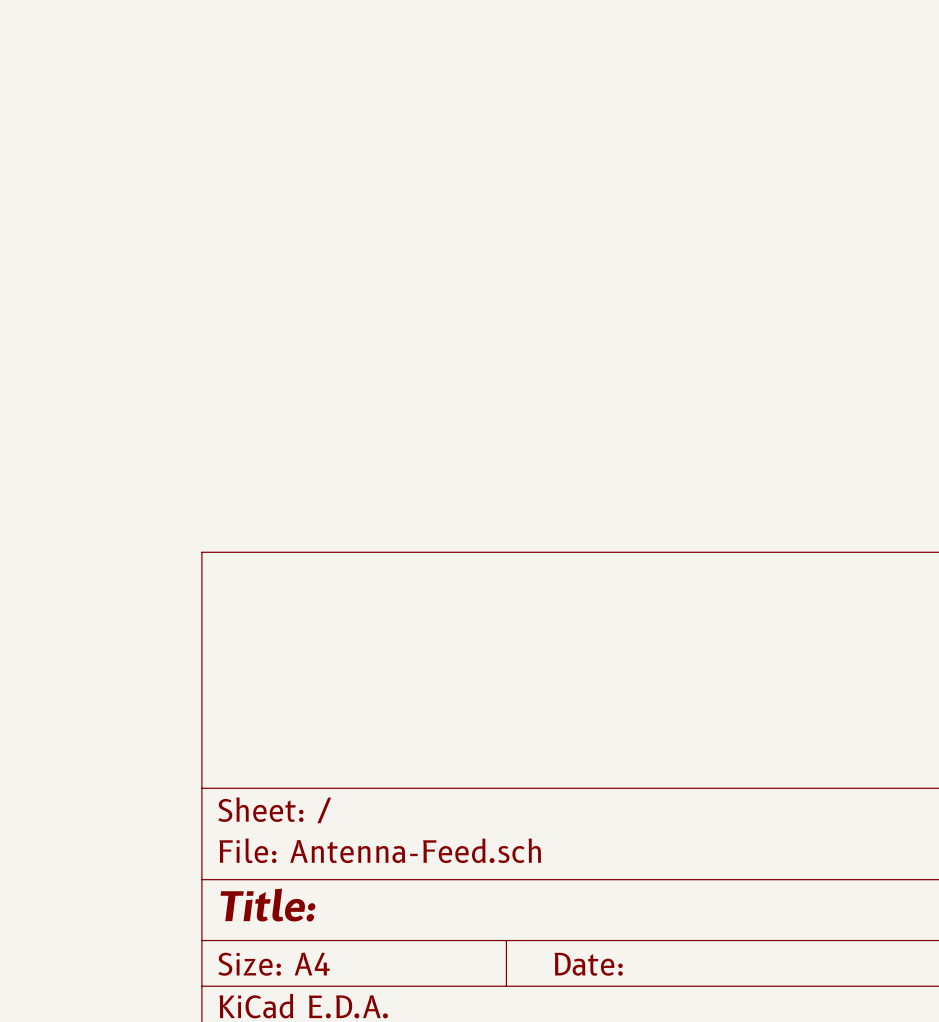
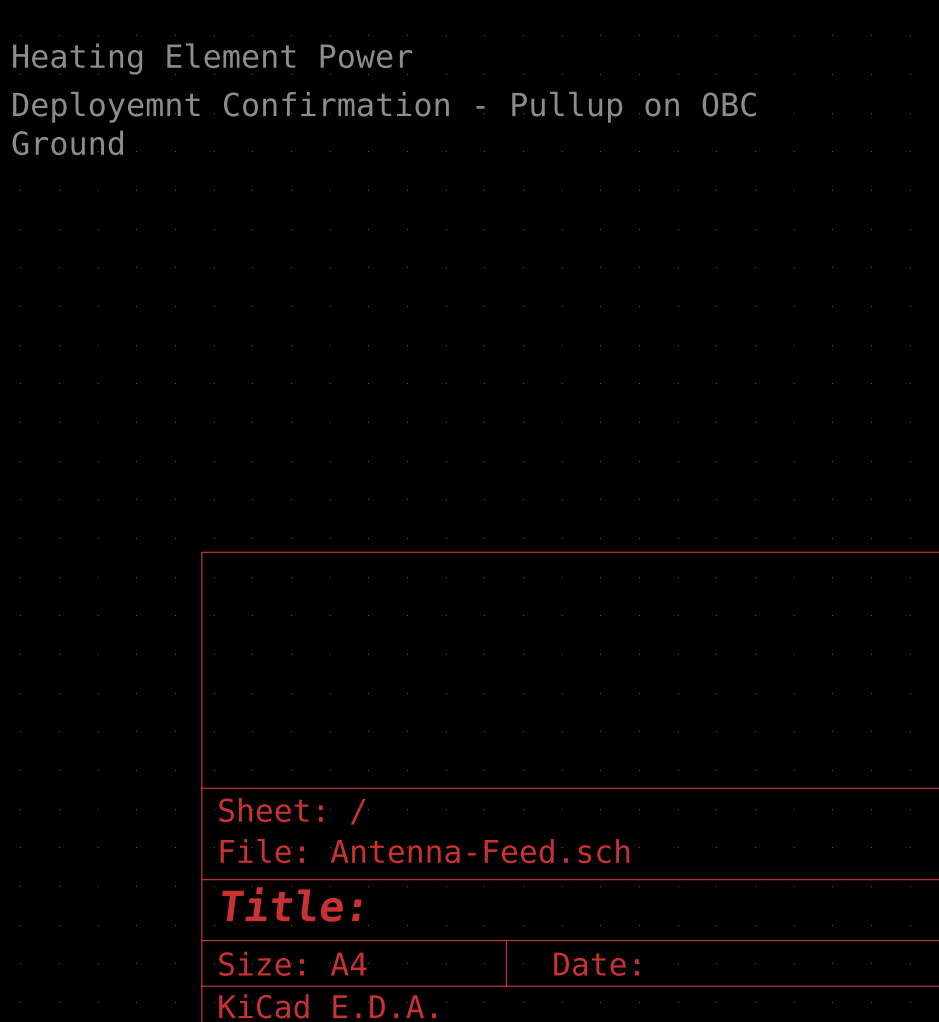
text: none -> Heating Element Power (212, 58)
text: none -> Deployemnt Confirmation - Pullup on OBC (384, 107)
text: none -> Ground (67, 142)

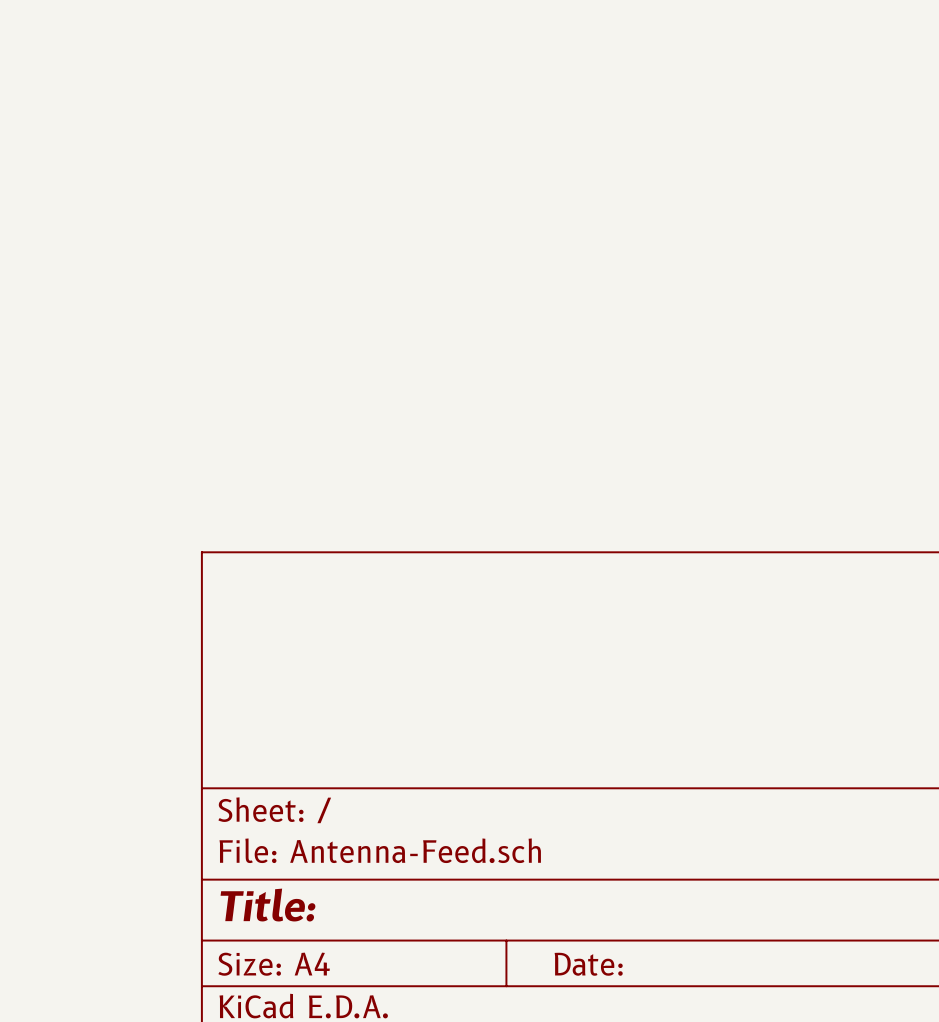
text: Heating Element Power (212, 58) -> none
text: Deployemnt Confirmation - Pullup on OBC (384, 107) -> none
text: Ground (67, 142) -> none

